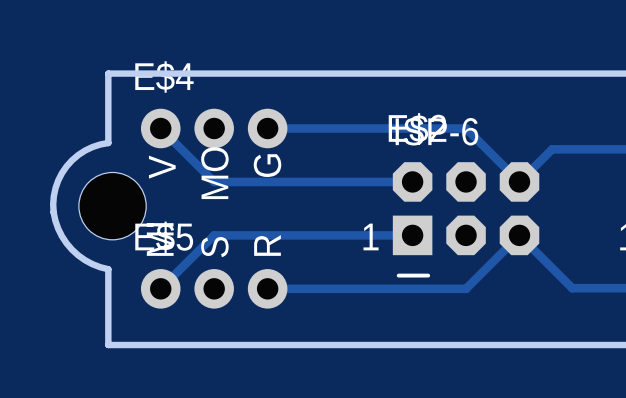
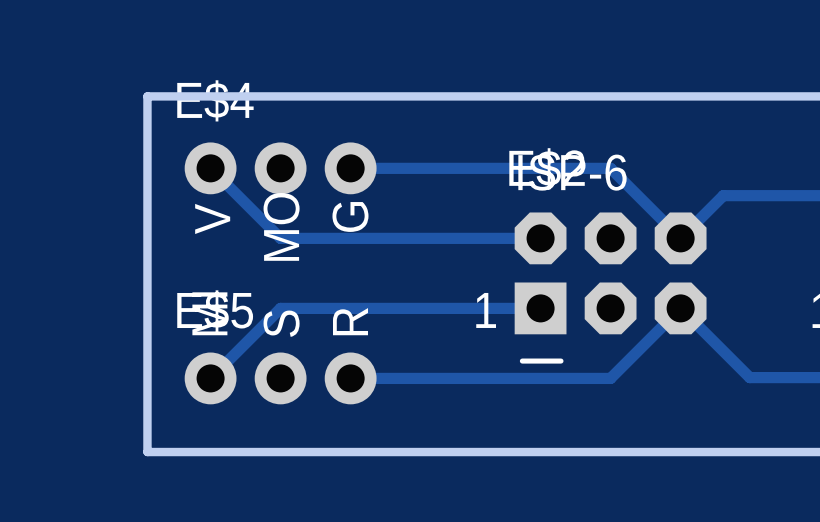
board edge: (112, 73) (108, 73) (108, 143) (85, 150) (66, 166) (55, 188) (53, 204) (55, 220) (66, 243) (84, 260) (108, 269) (108, 345) (112, 345) -> (147, 96) (147, 452)
hole: (112, 206) -> none

